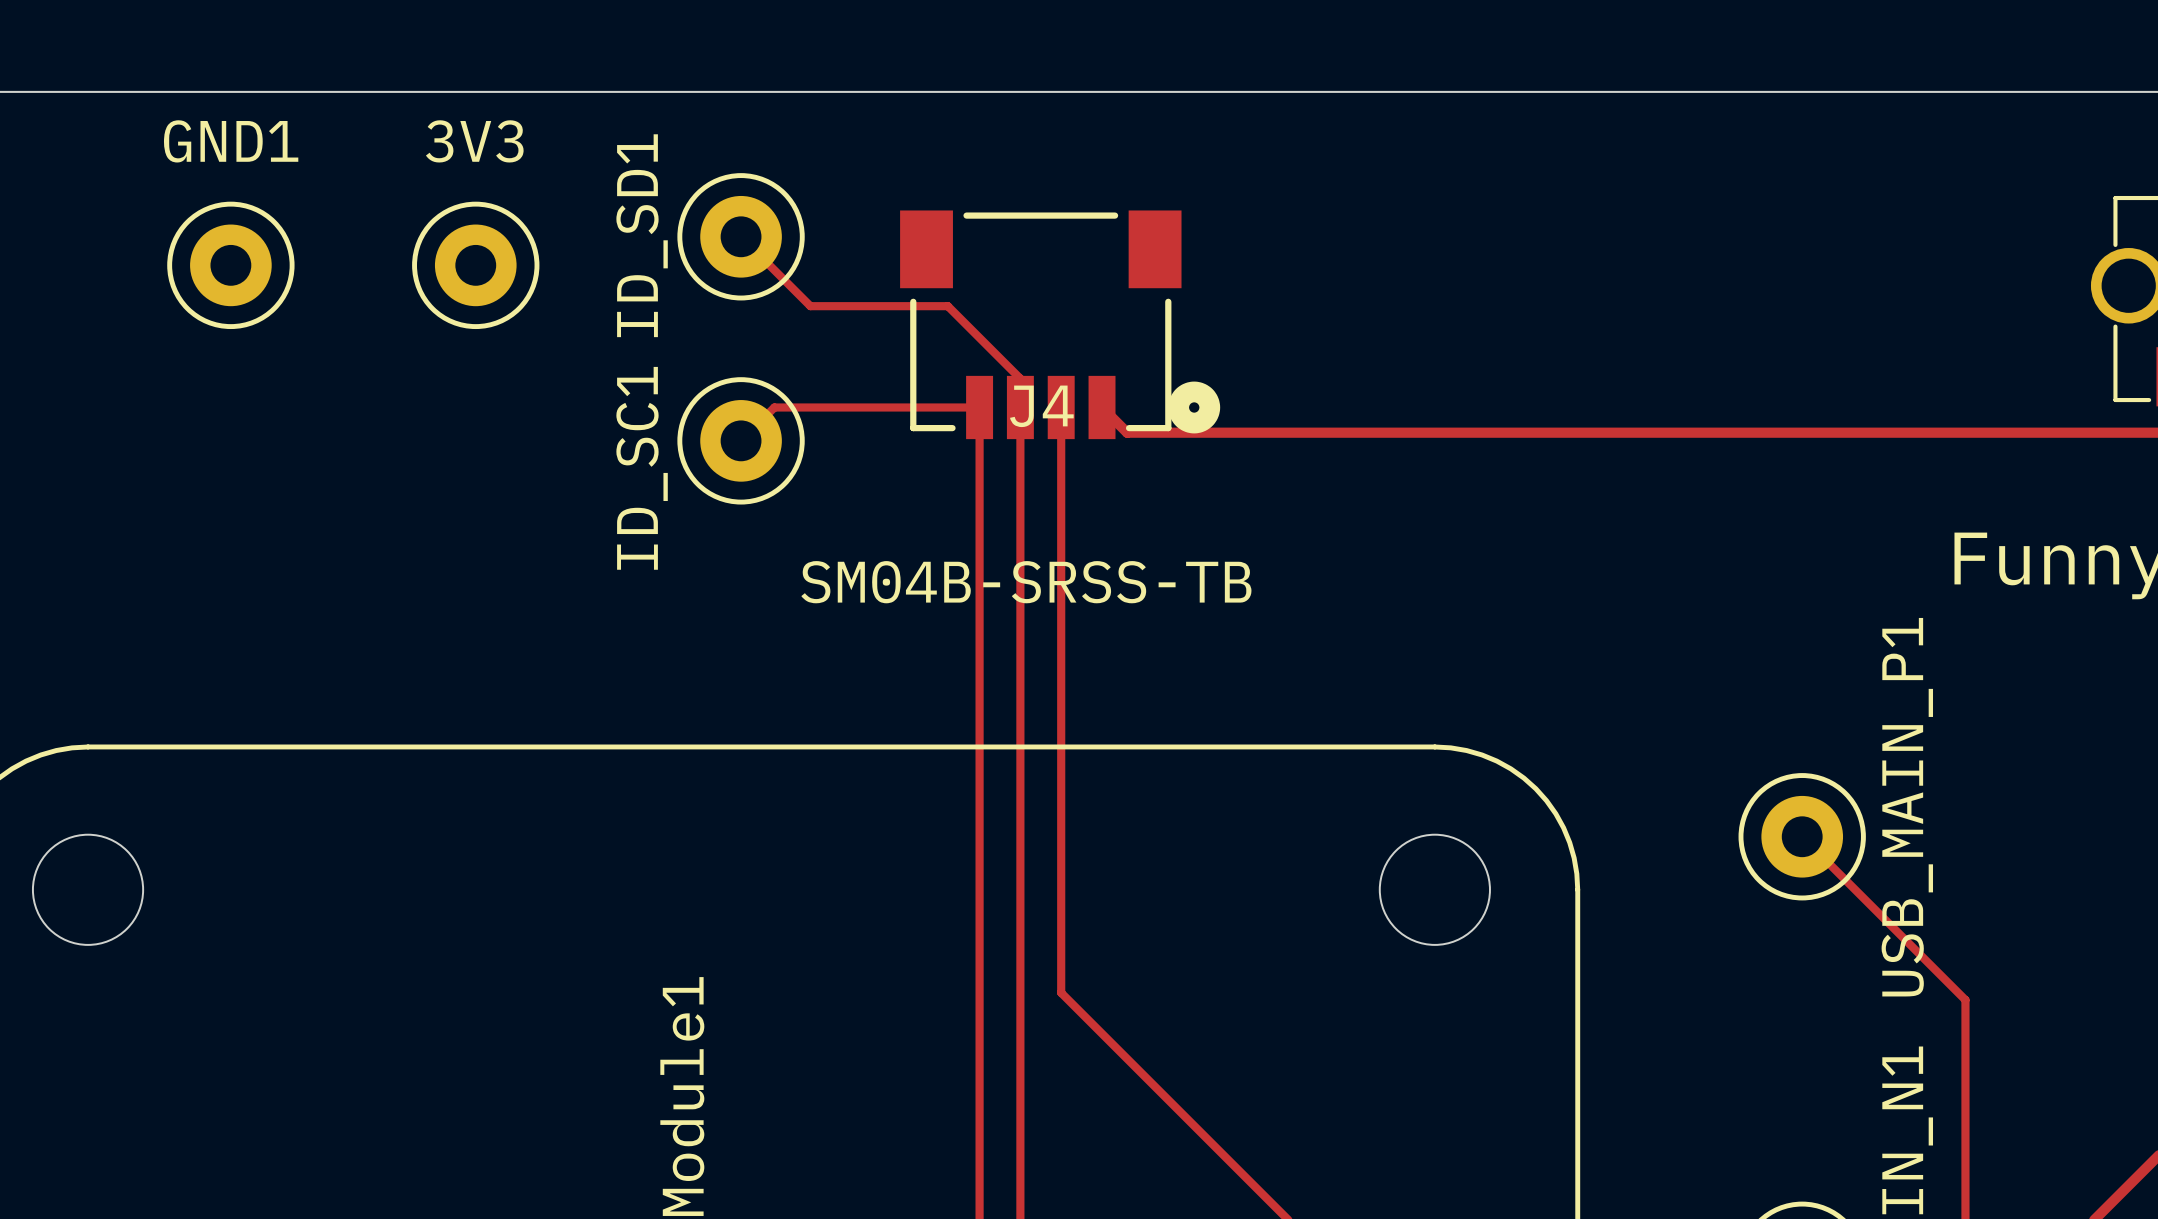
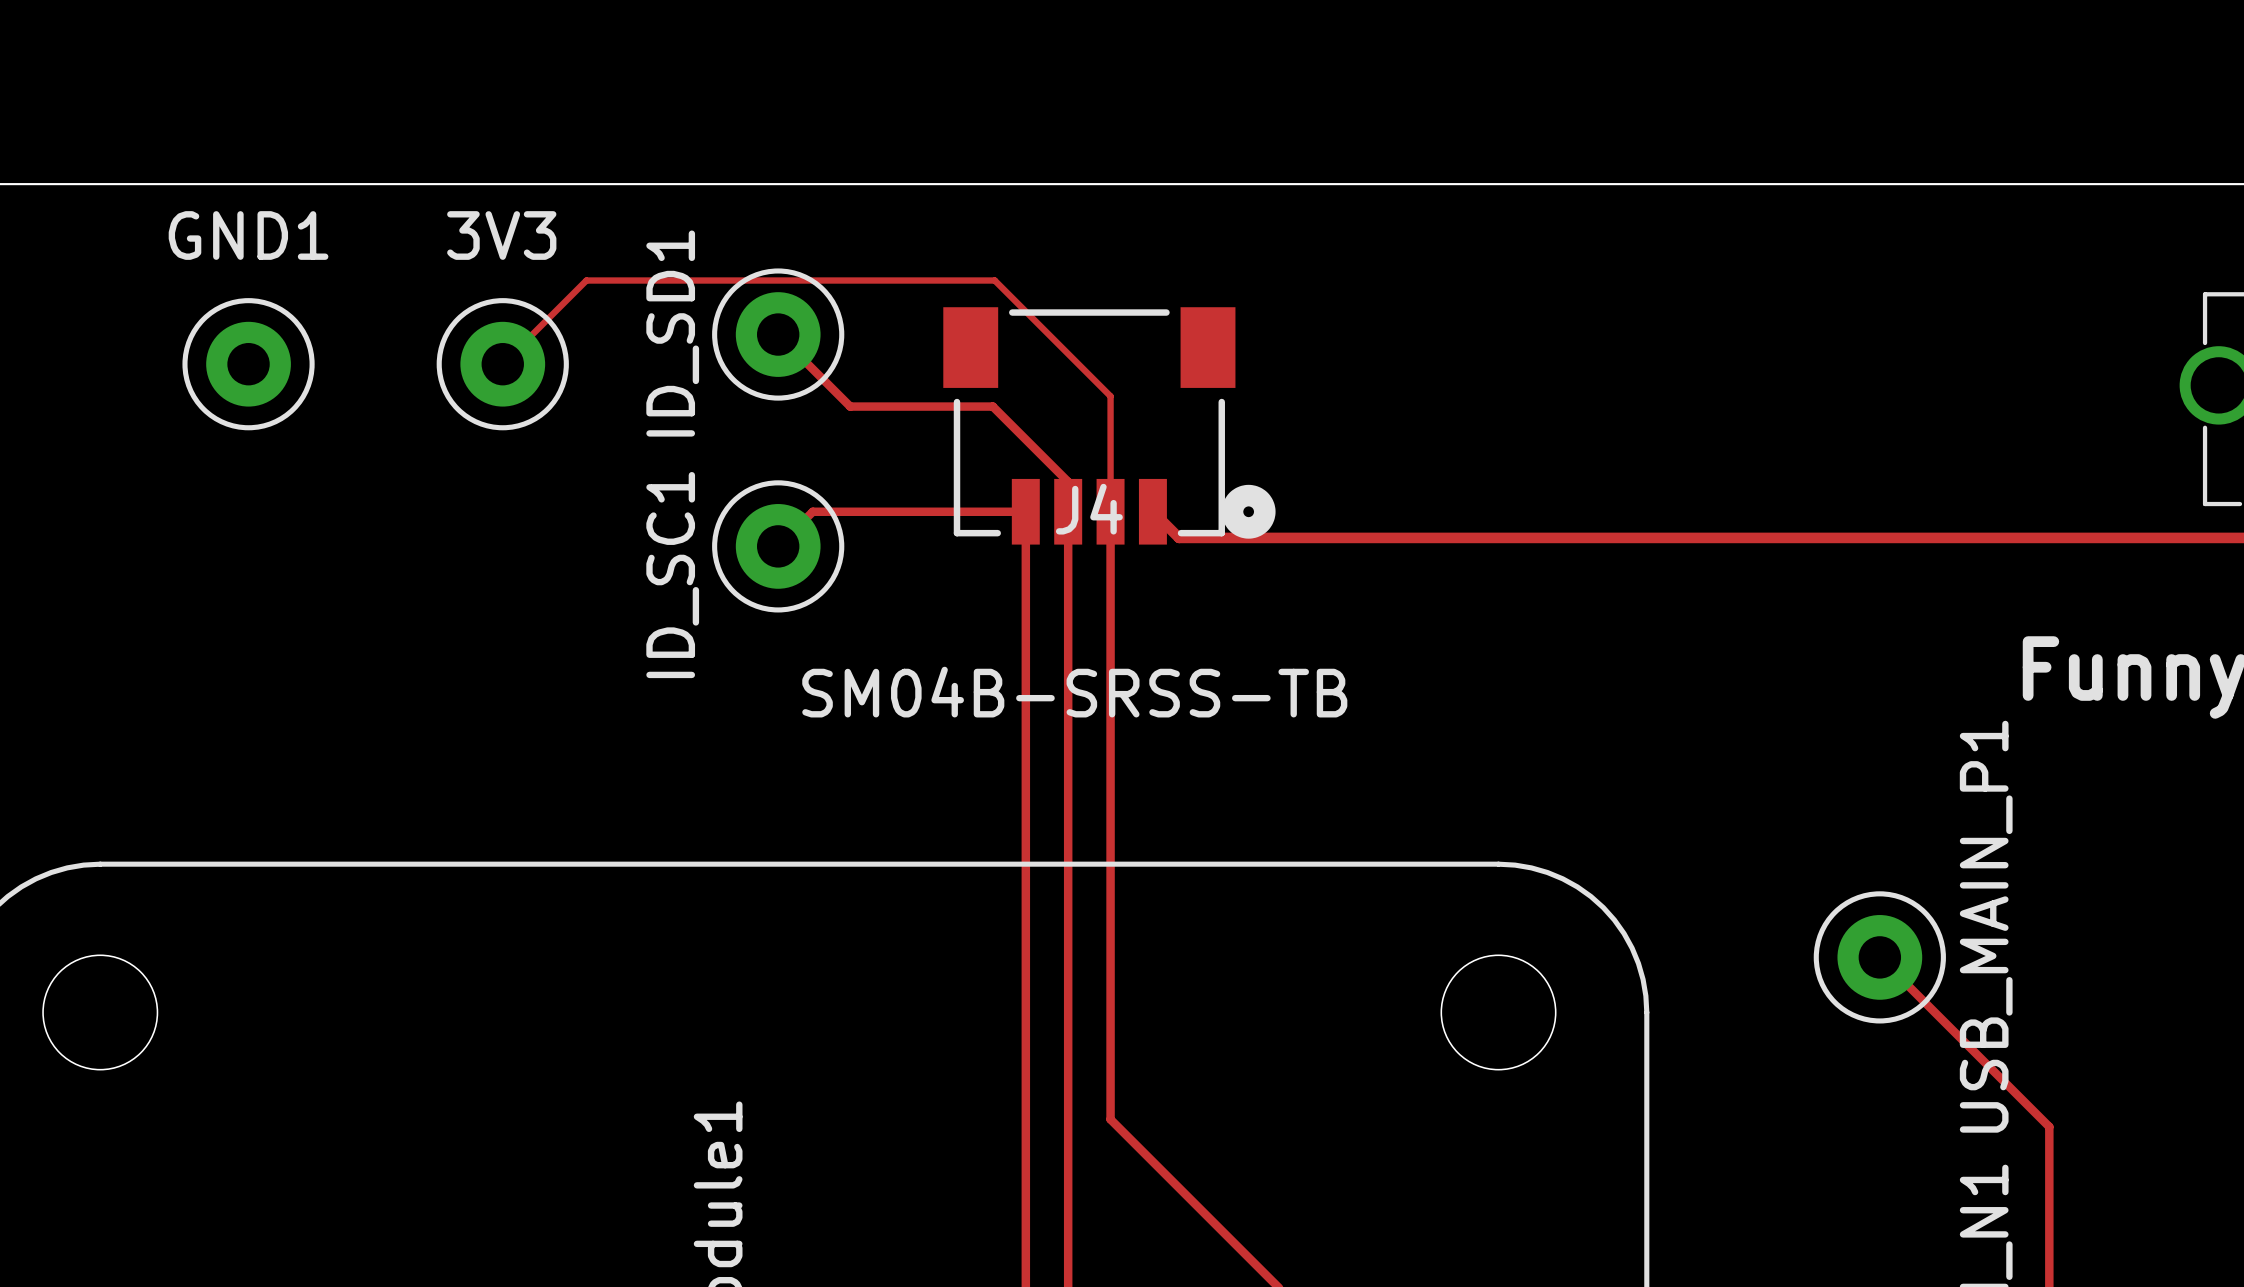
track: none -> (502, 364) (586, 280) (994, 280) (1110, 396) (1110, 511)

